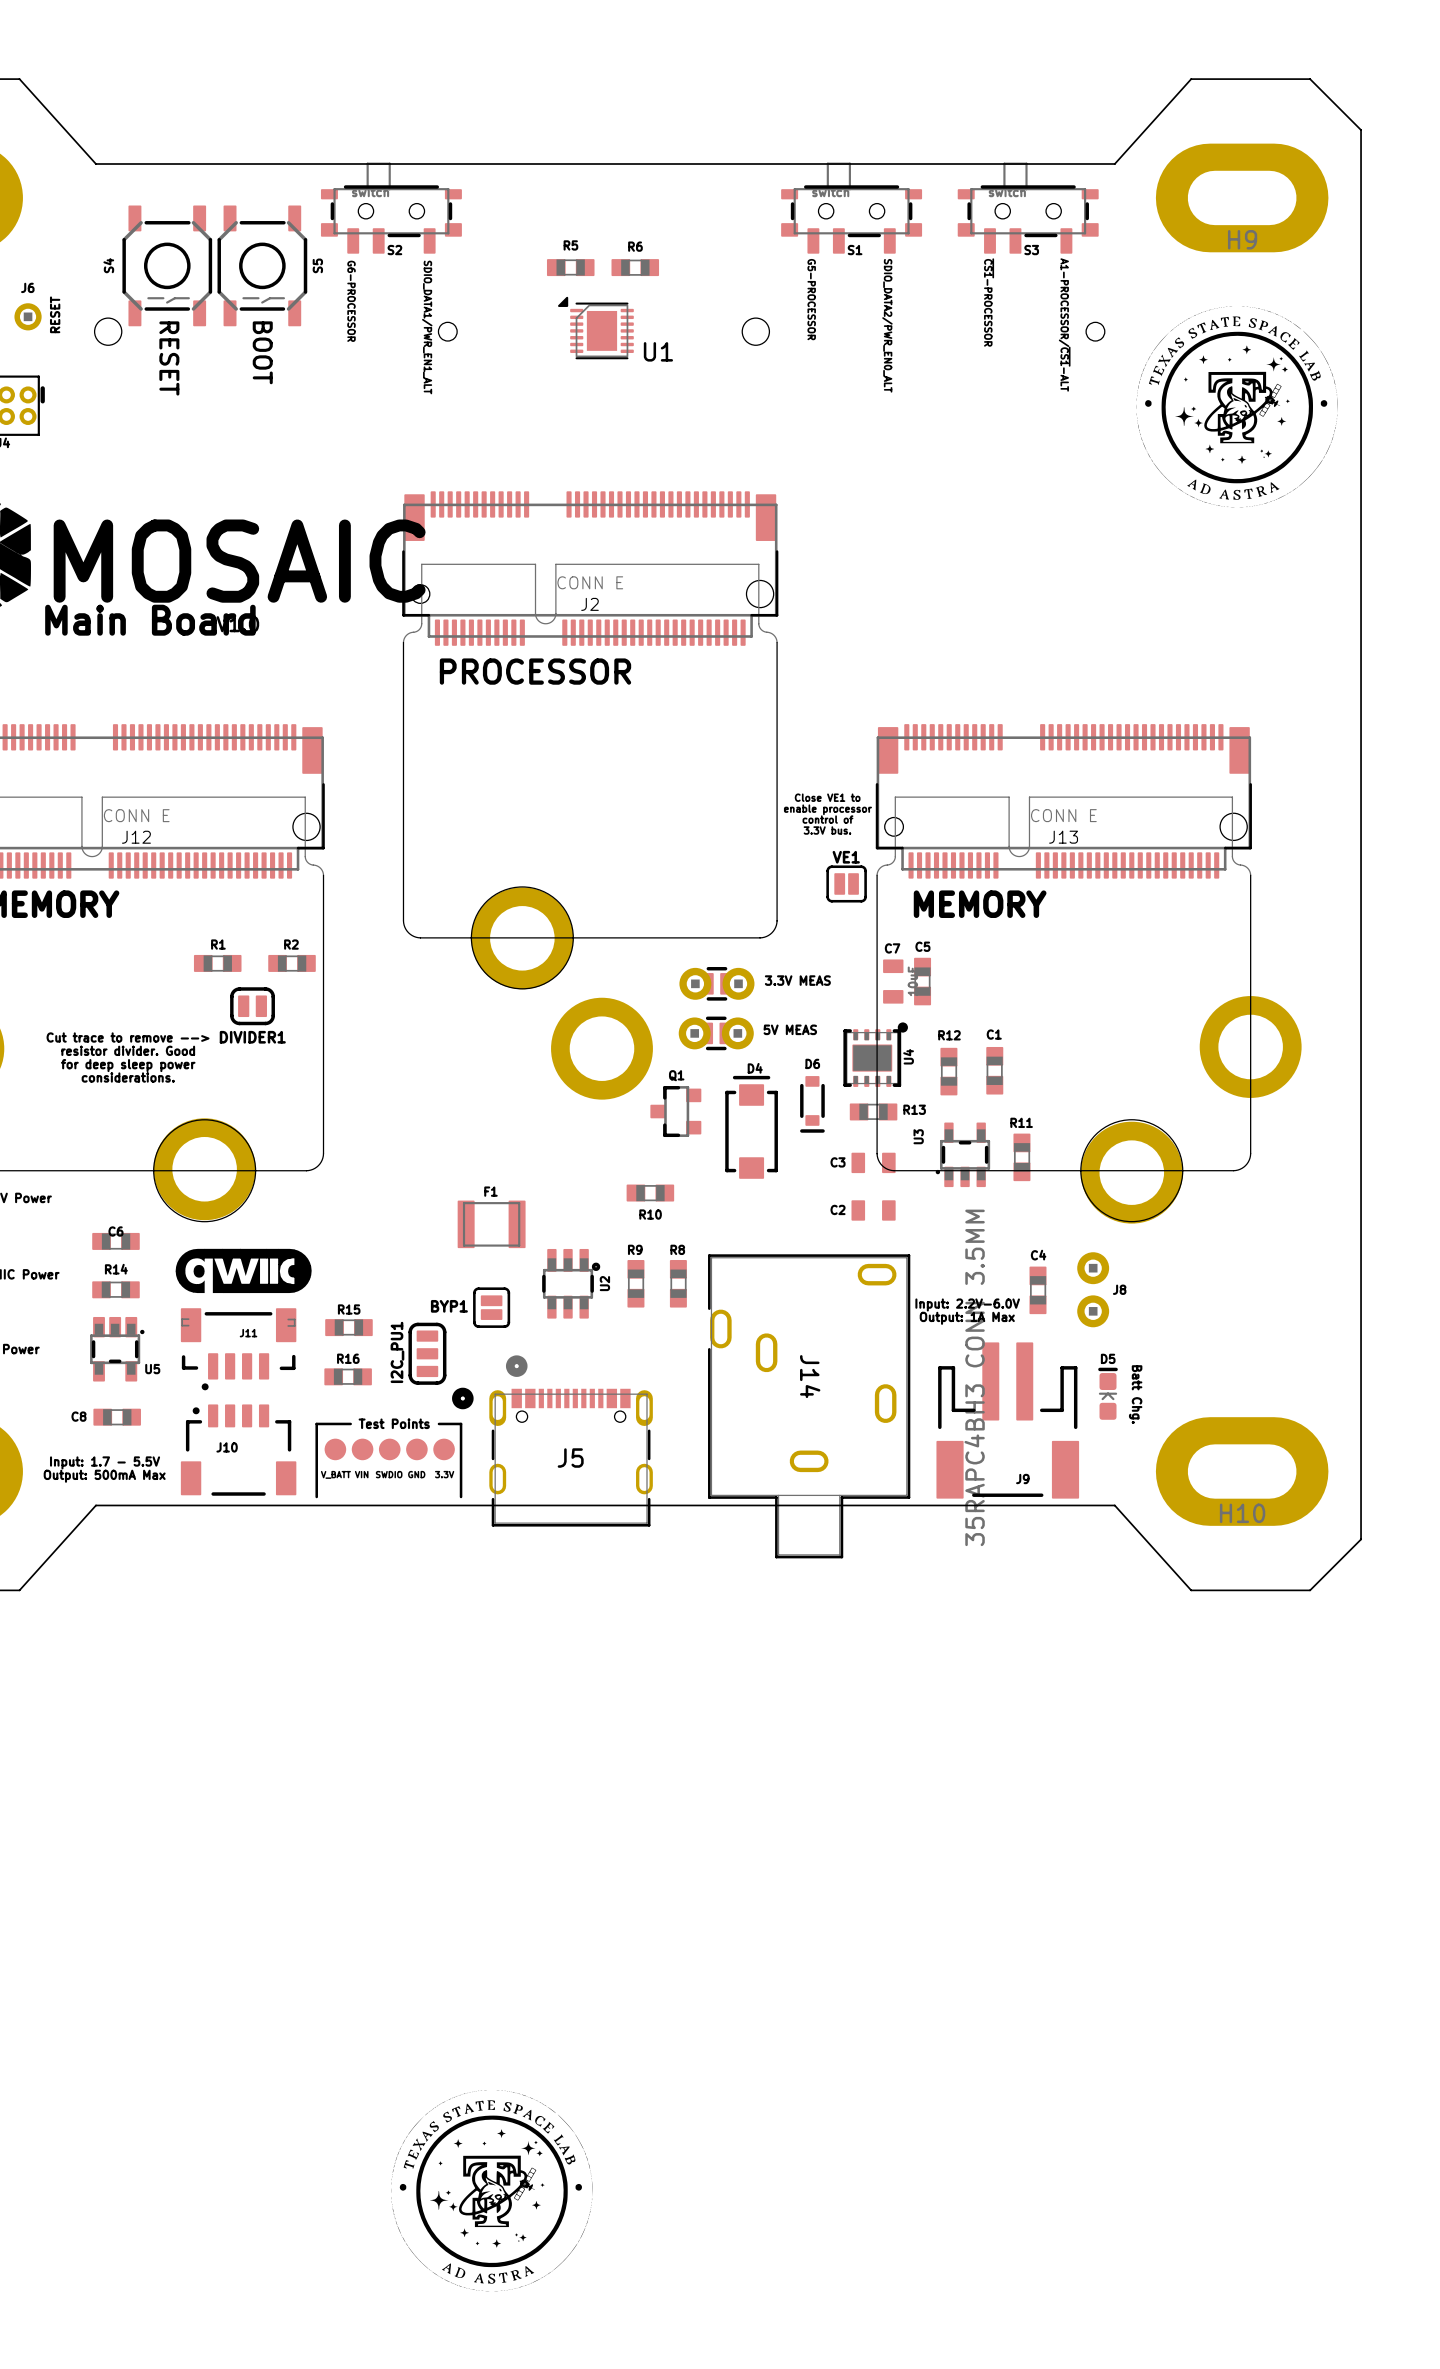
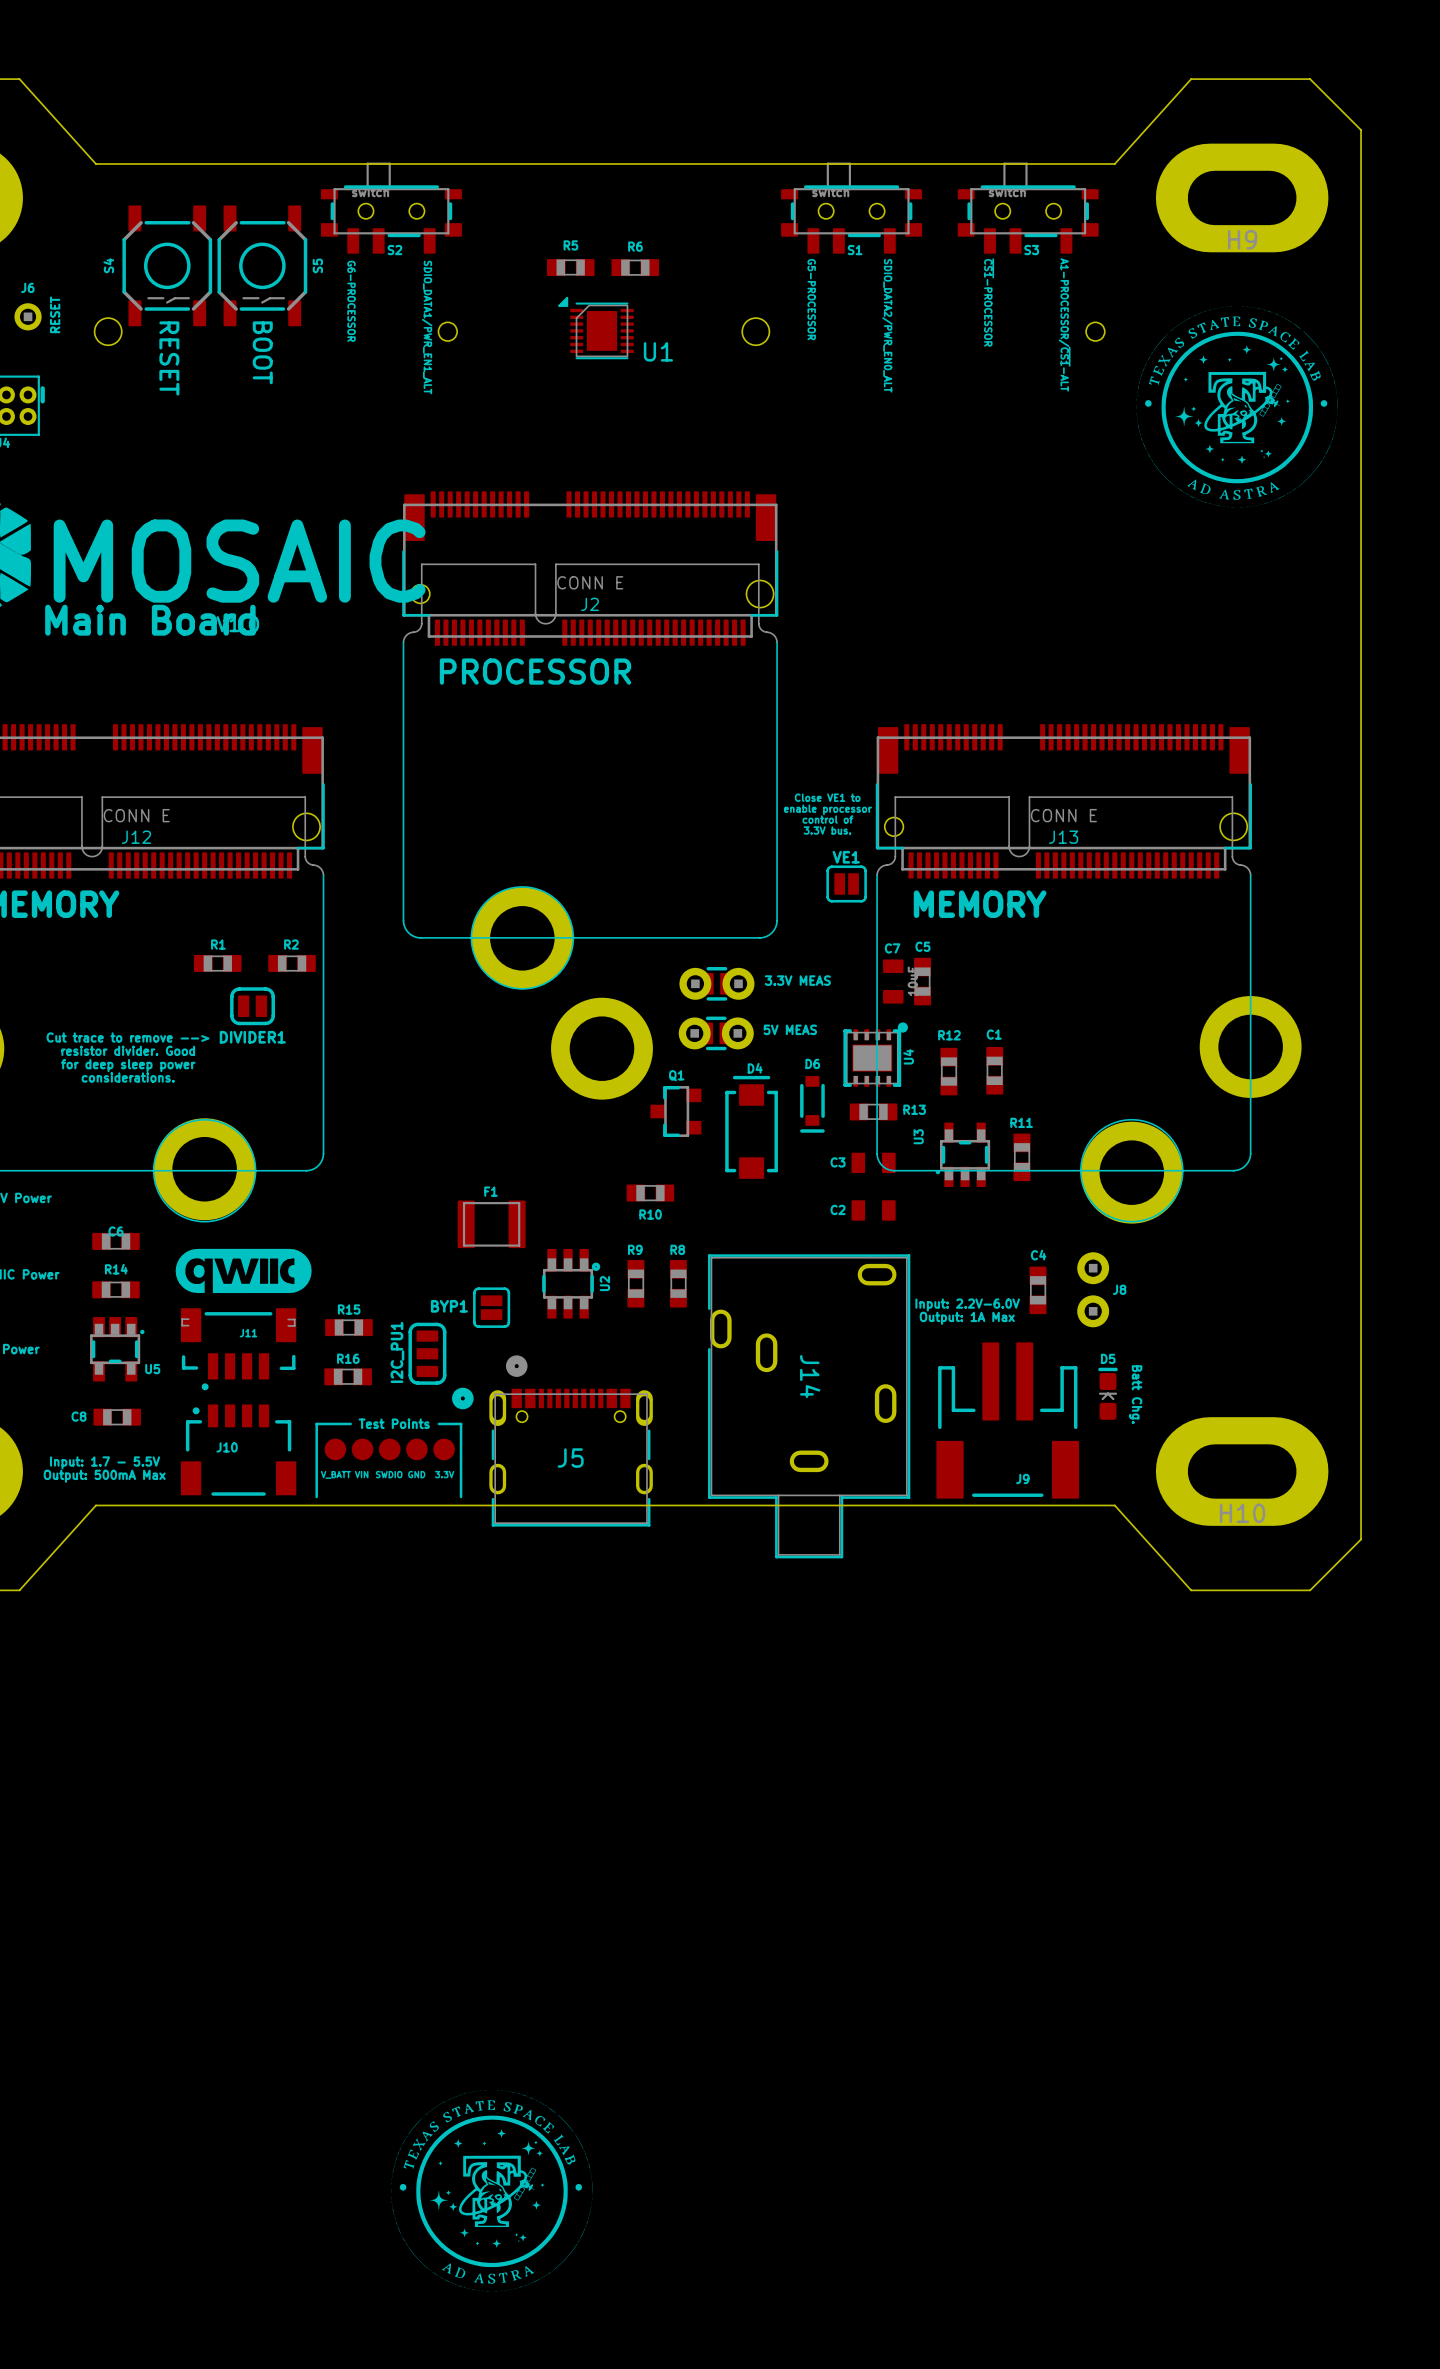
J14 value: 35RAPC4BH3 CONN 3.5MM (974, 1377) -> none

